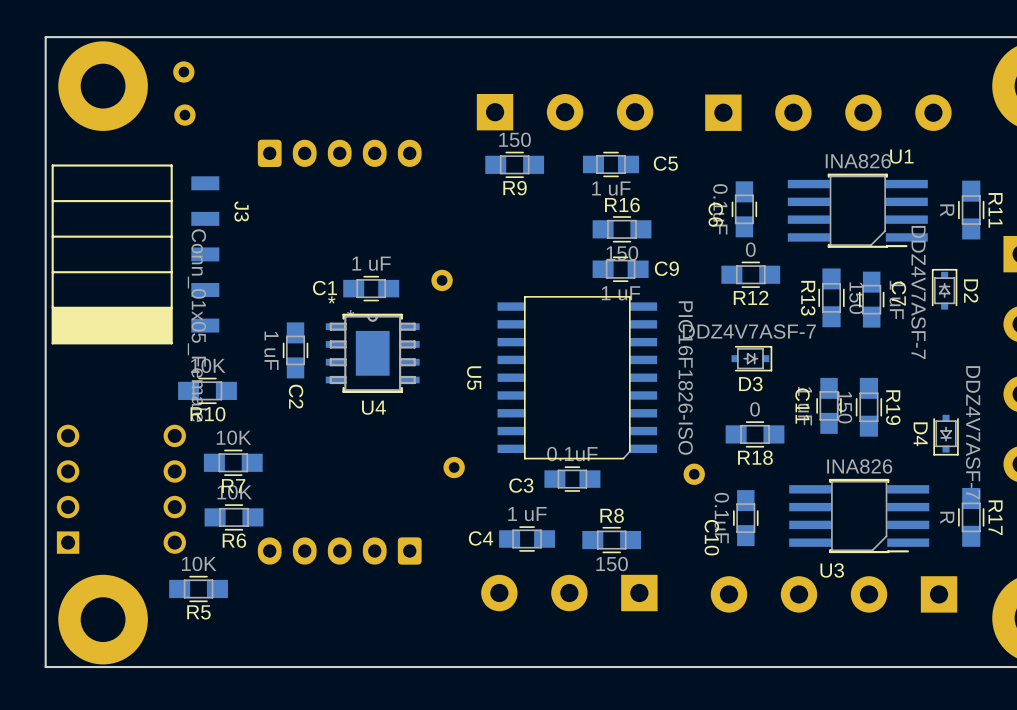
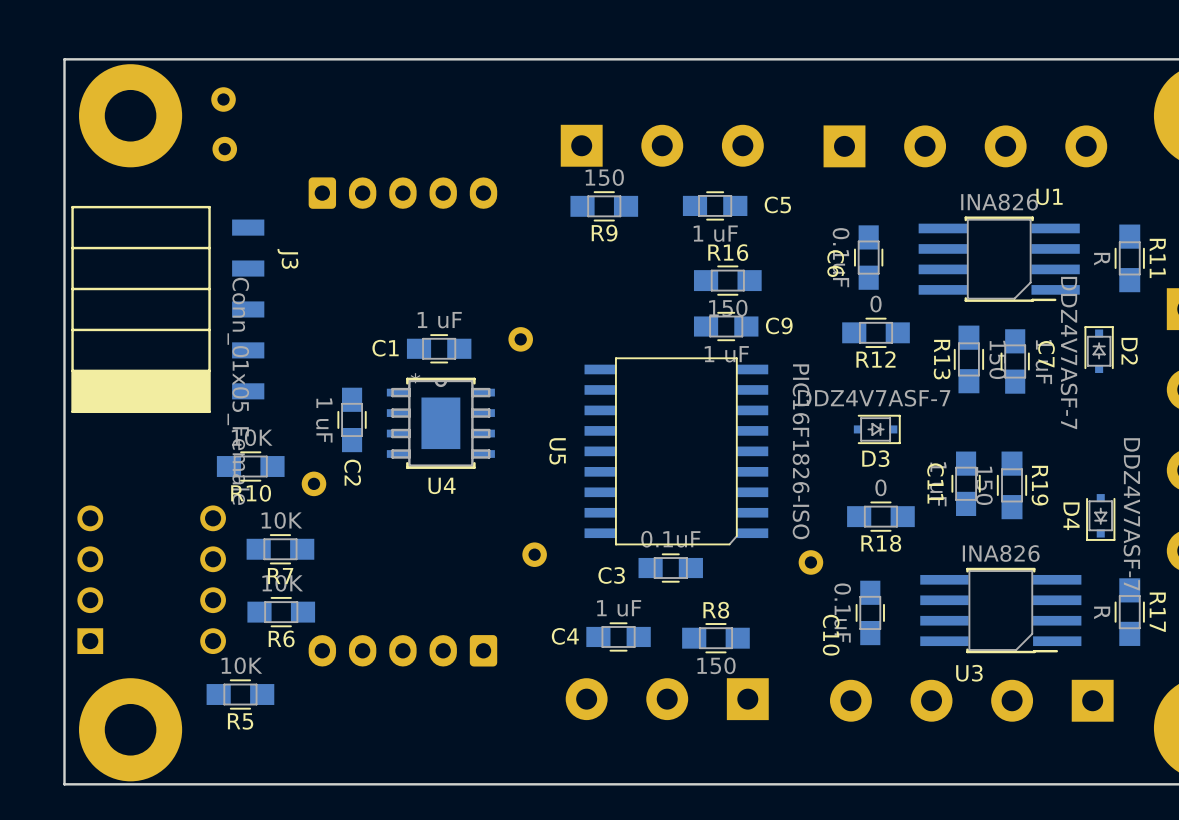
U4 text: * (331, 299) -> none
part: none -> (313, 483)

